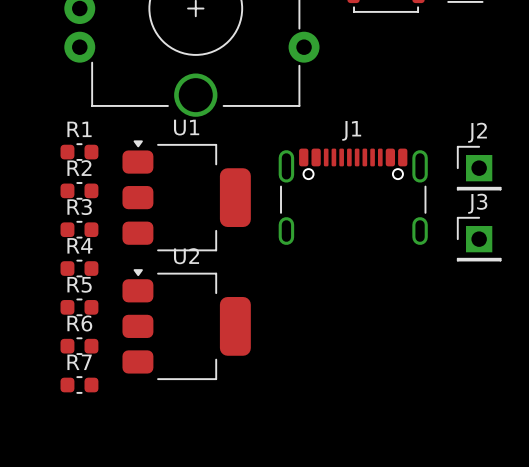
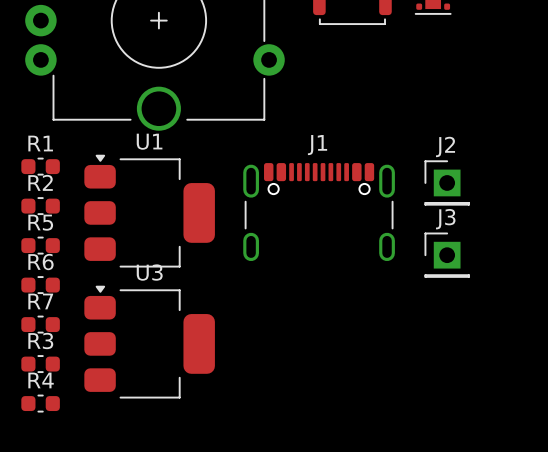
R3 name: R3 (79, 207) -> R5 (40, 222)
R4 name: R4 (79, 245) -> R6 (40, 262)
U2 name: U2 (186, 256) -> U3 (149, 272)
R5 name: R5 (79, 284) -> R7 (40, 301)
R6 name: R6 (79, 323) -> R3 (40, 340)
R7 name: R7 (79, 362) -> R4 (41, 380)

